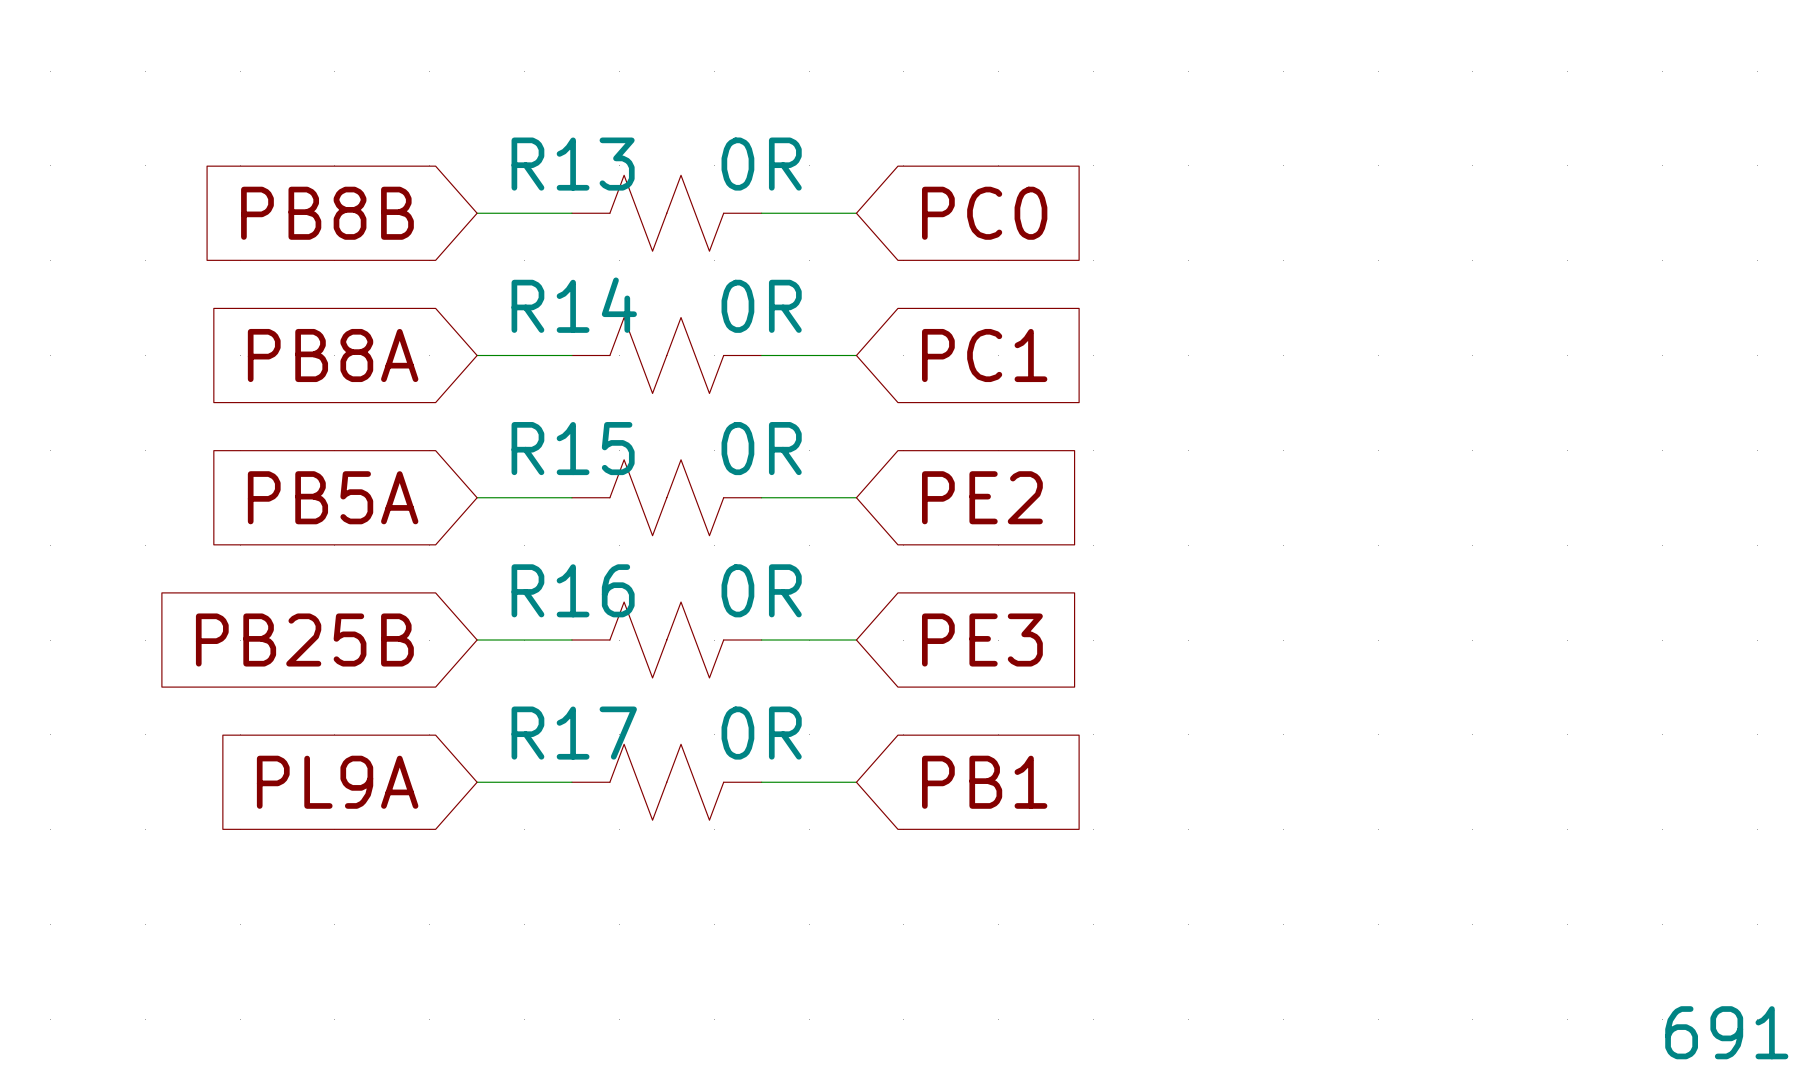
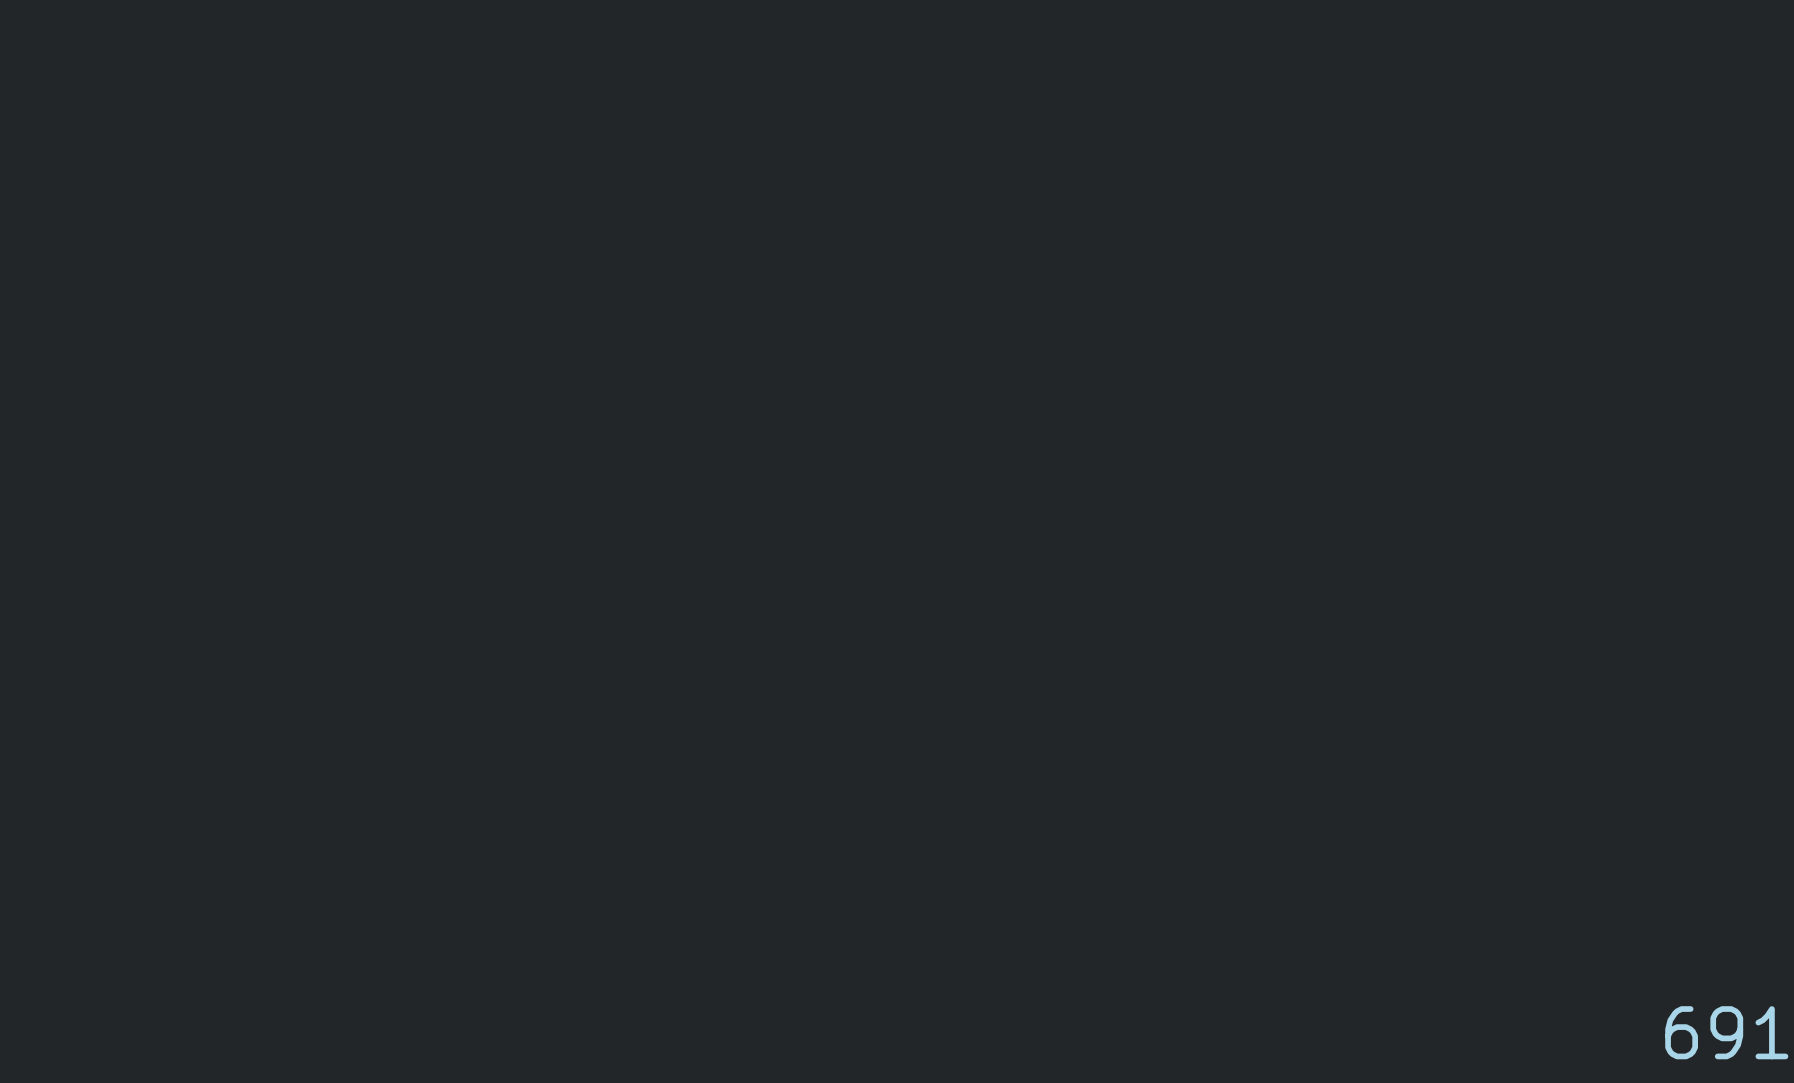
global label: PB8B (327, 213) -> none
wire: (477, 213) (571, 213) -> none
R13: 0R (666, 213) -> none
wire: (761, 213) (856, 213) -> none
global label: PC0 (984, 213) -> none
global label: PB8A (333, 355) -> none
wire: (477, 355) (571, 355) -> none
R14: 0R (666, 355) -> none
wire: (761, 355) (856, 355) -> none
global label: PC1 (984, 355) -> none
global label: PB5A (333, 497) -> none
wire: (477, 497) (571, 497) -> none
R15: 0R (666, 497) -> none
wire: (761, 497) (856, 497) -> none
global label: PE2 (982, 497) -> none
global label: PB25B (304, 640) -> none
wire: (477, 640) (571, 640) -> none
R16: 0R (666, 640) -> none
wire: (761, 640) (856, 640) -> none
global label: PE3 (982, 640) -> none
global label: PL9A (337, 782) -> none
wire: (477, 782) (571, 782) -> none
R17: 0R (666, 782) -> none
wire: (761, 782) (856, 782) -> none
global label: PB1 (984, 782) -> none

